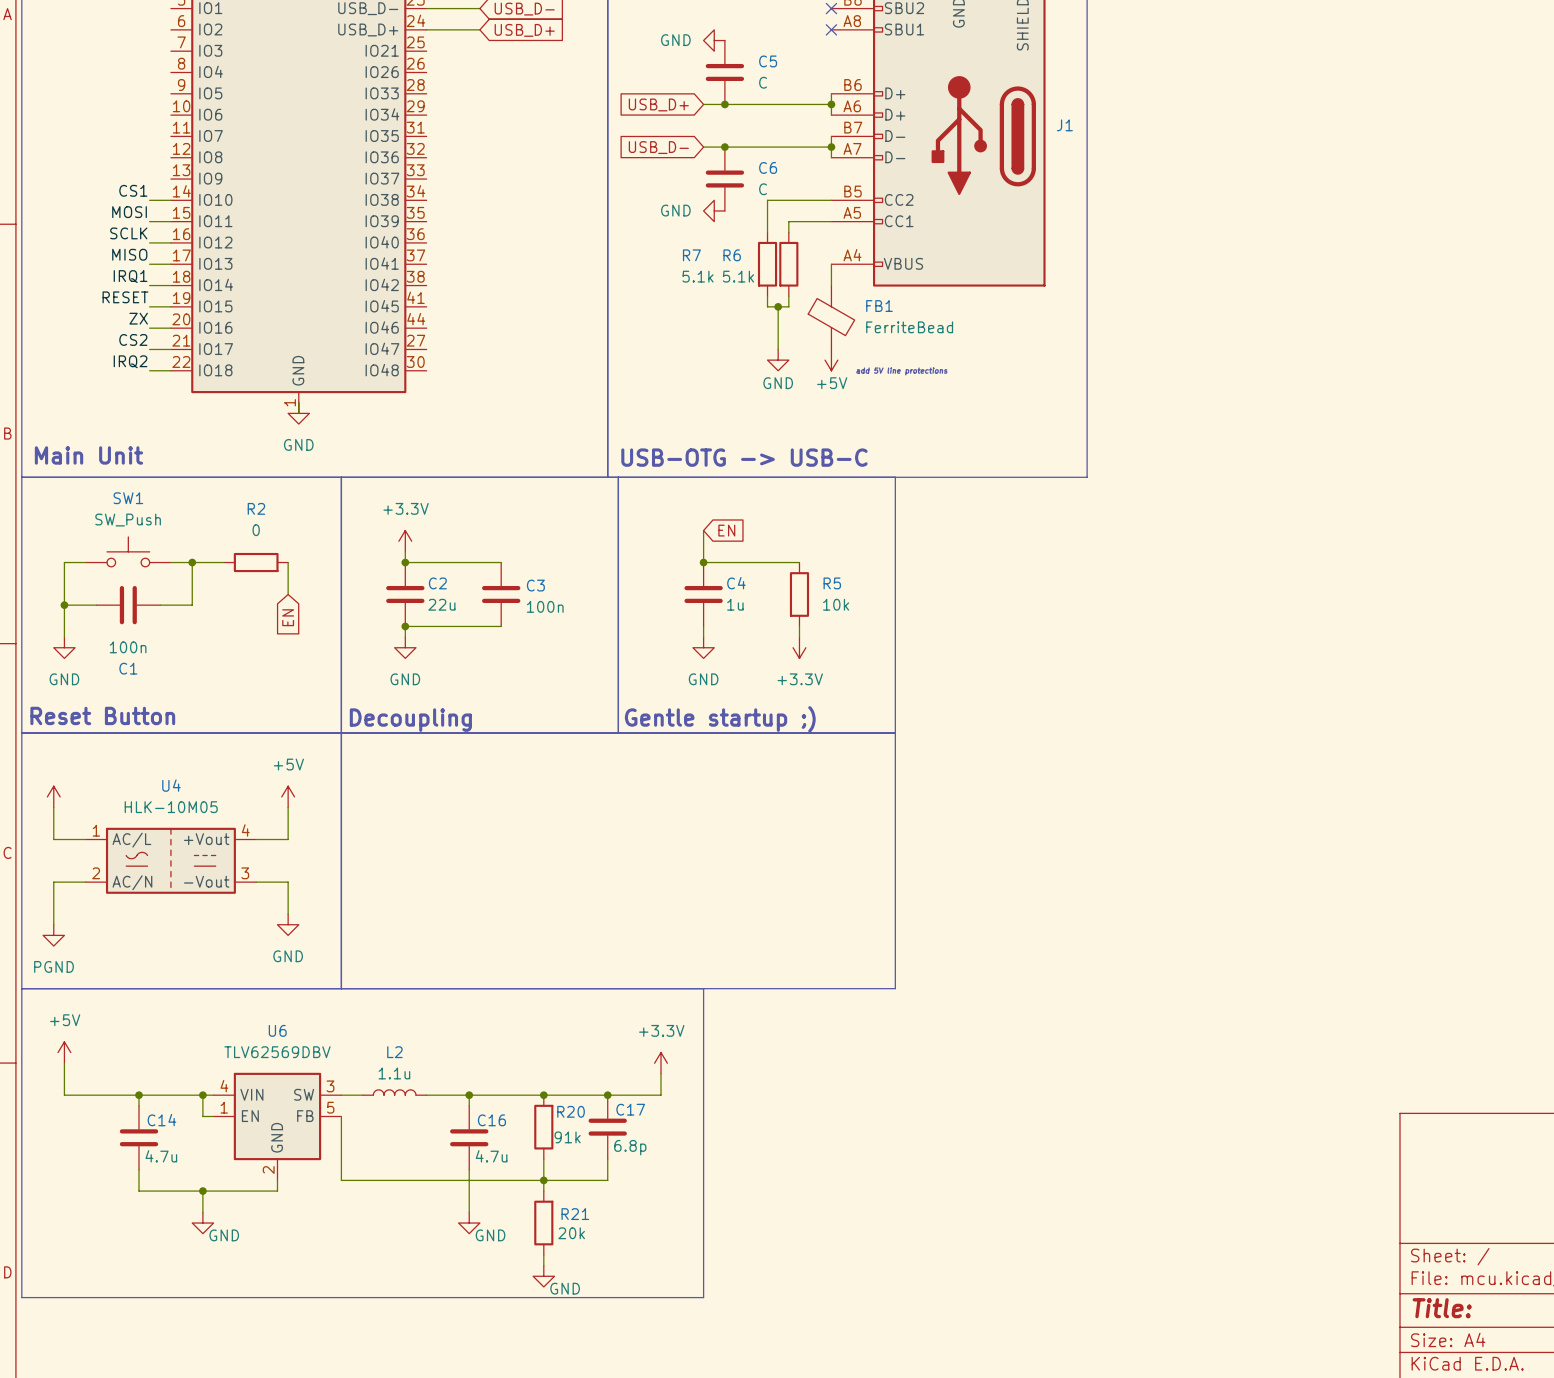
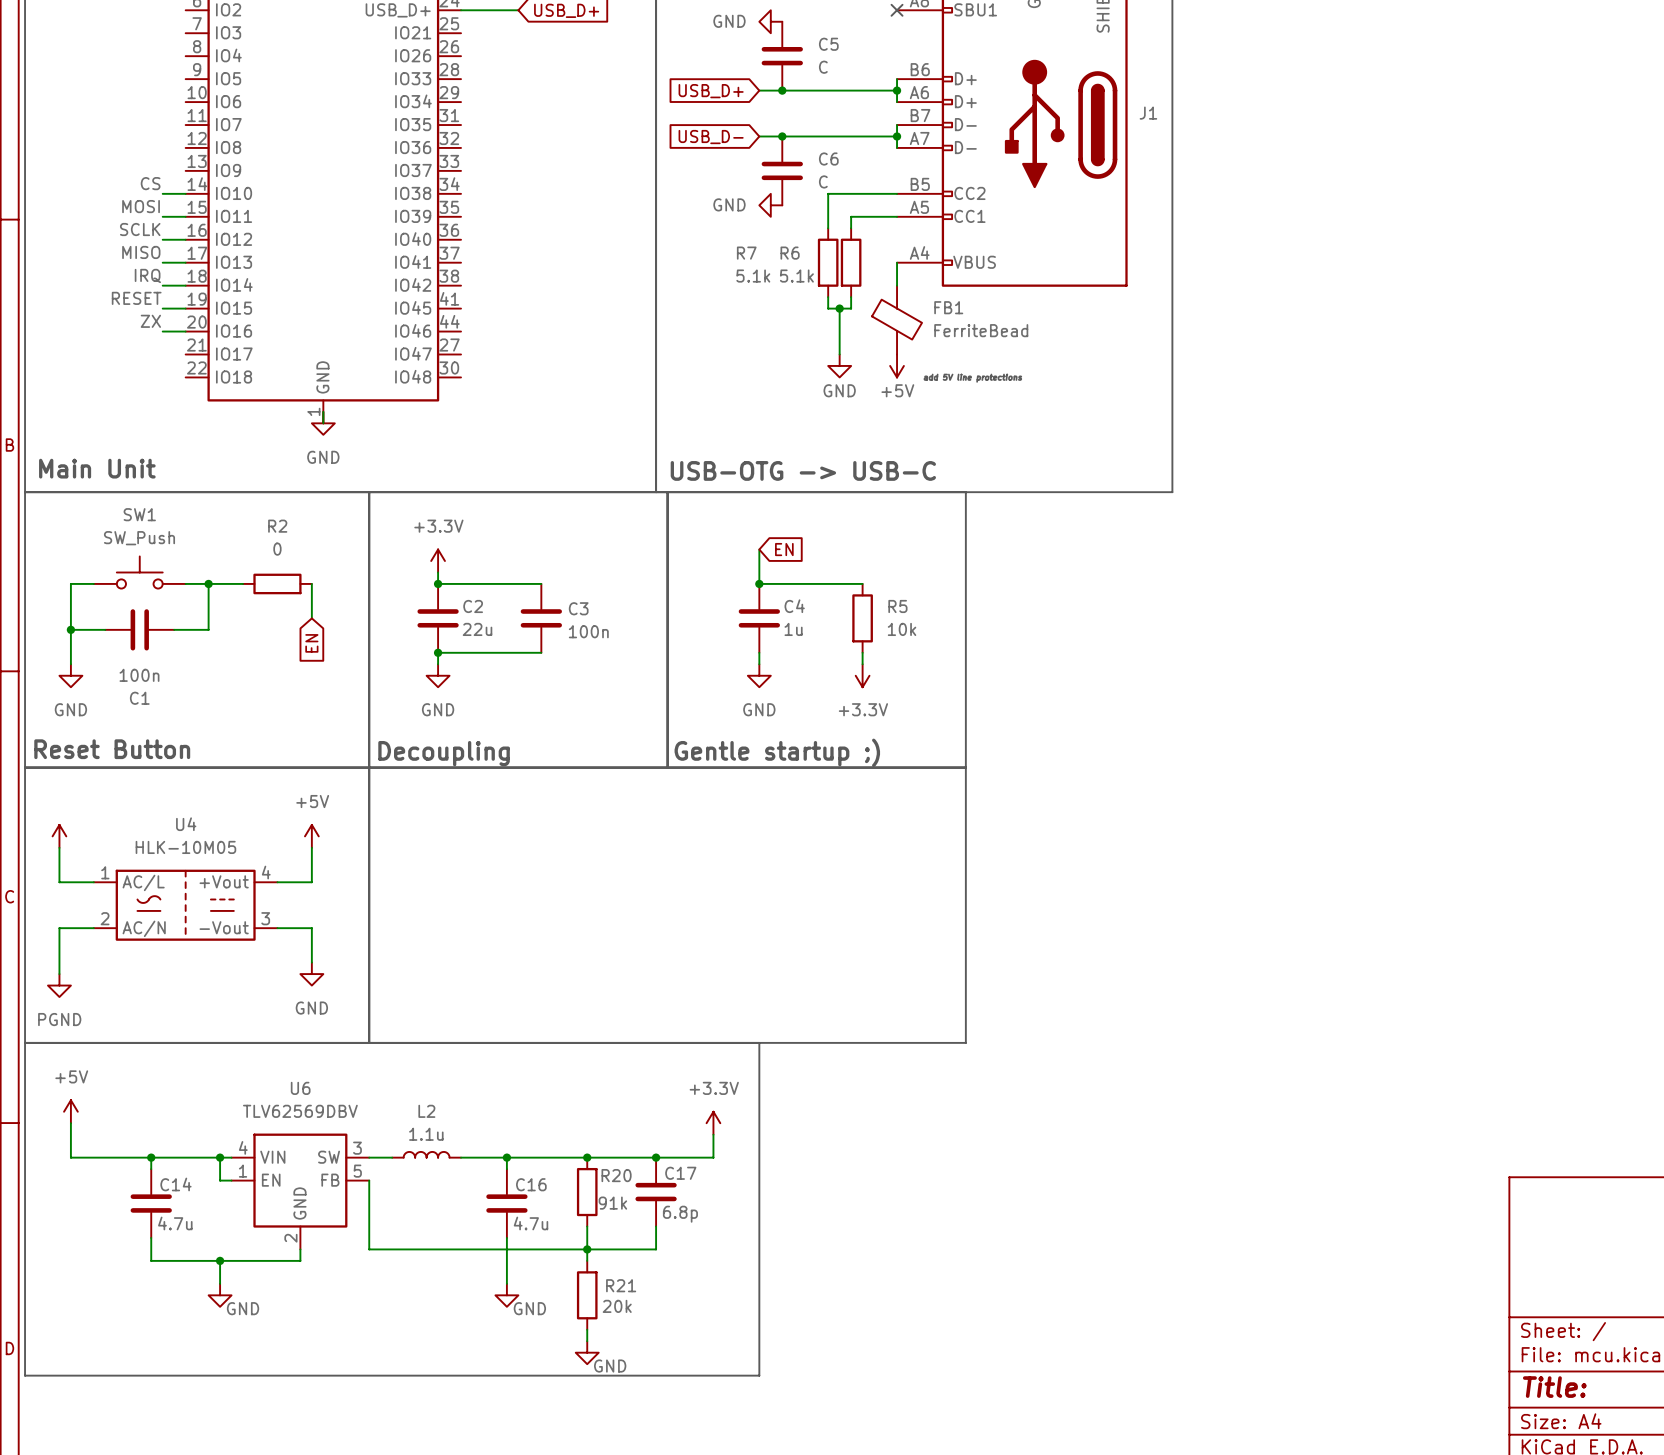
label: CS1 (133, 190) -> CS (150, 183)
label: IRQ1 (130, 276) -> IRQ (147, 275)
label: CS2 (133, 339) -> none
wire: (149, 349) (170, 349) -> none
label: IRQ2 (130, 361) -> none
wire: (149, 370) (170, 370) -> none

